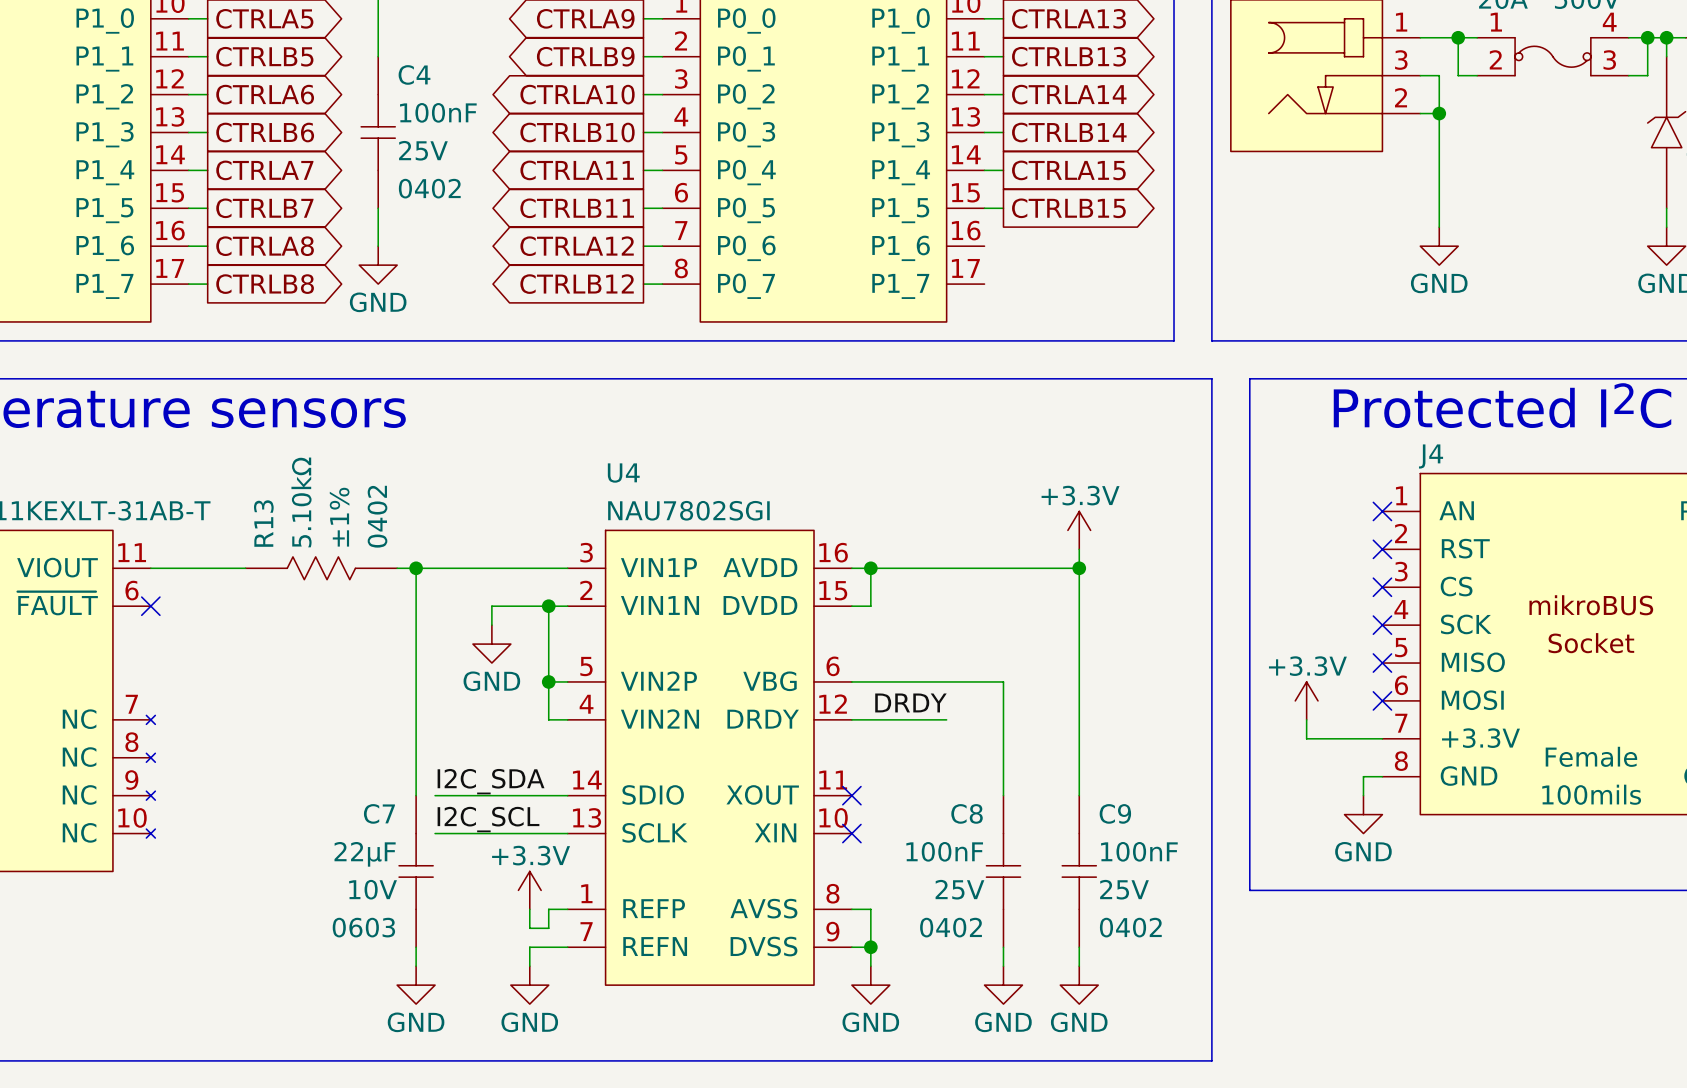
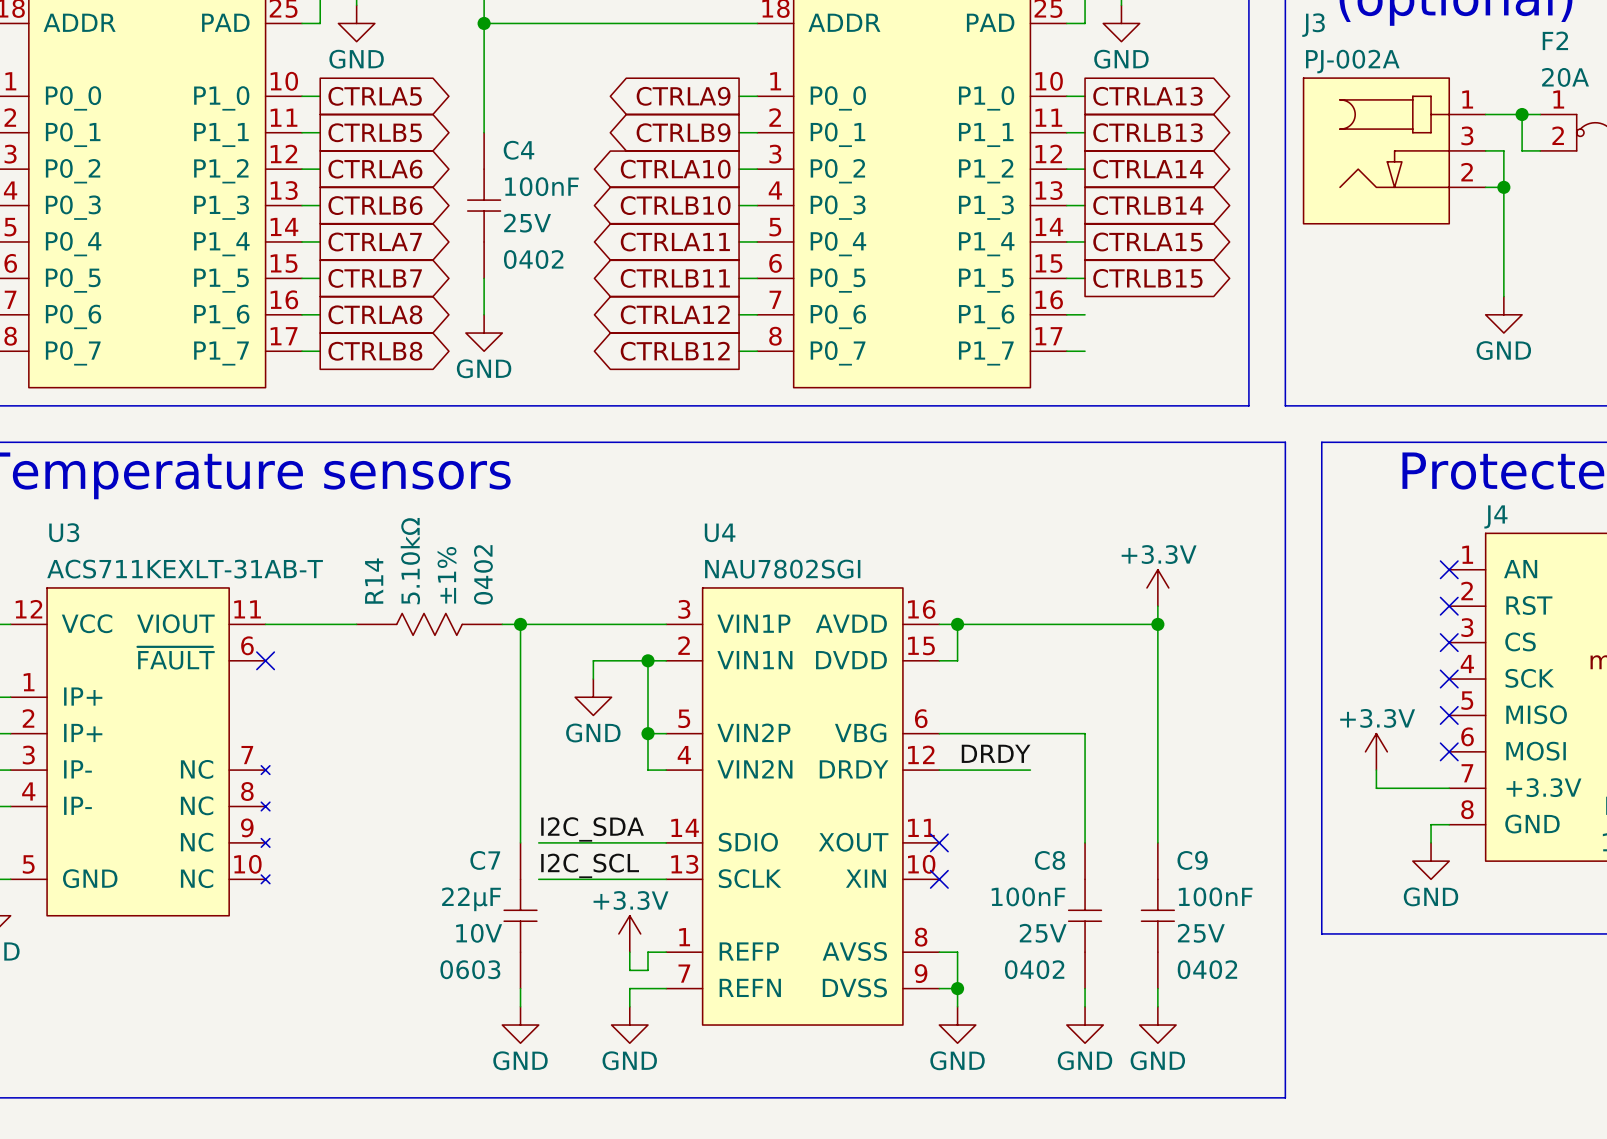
wire: none -> (1066, 314) (1085, 314)
wire: none -> (1066, 351) (1085, 351)
R13 name: R13 (263, 523) -> R14 (374, 581)

